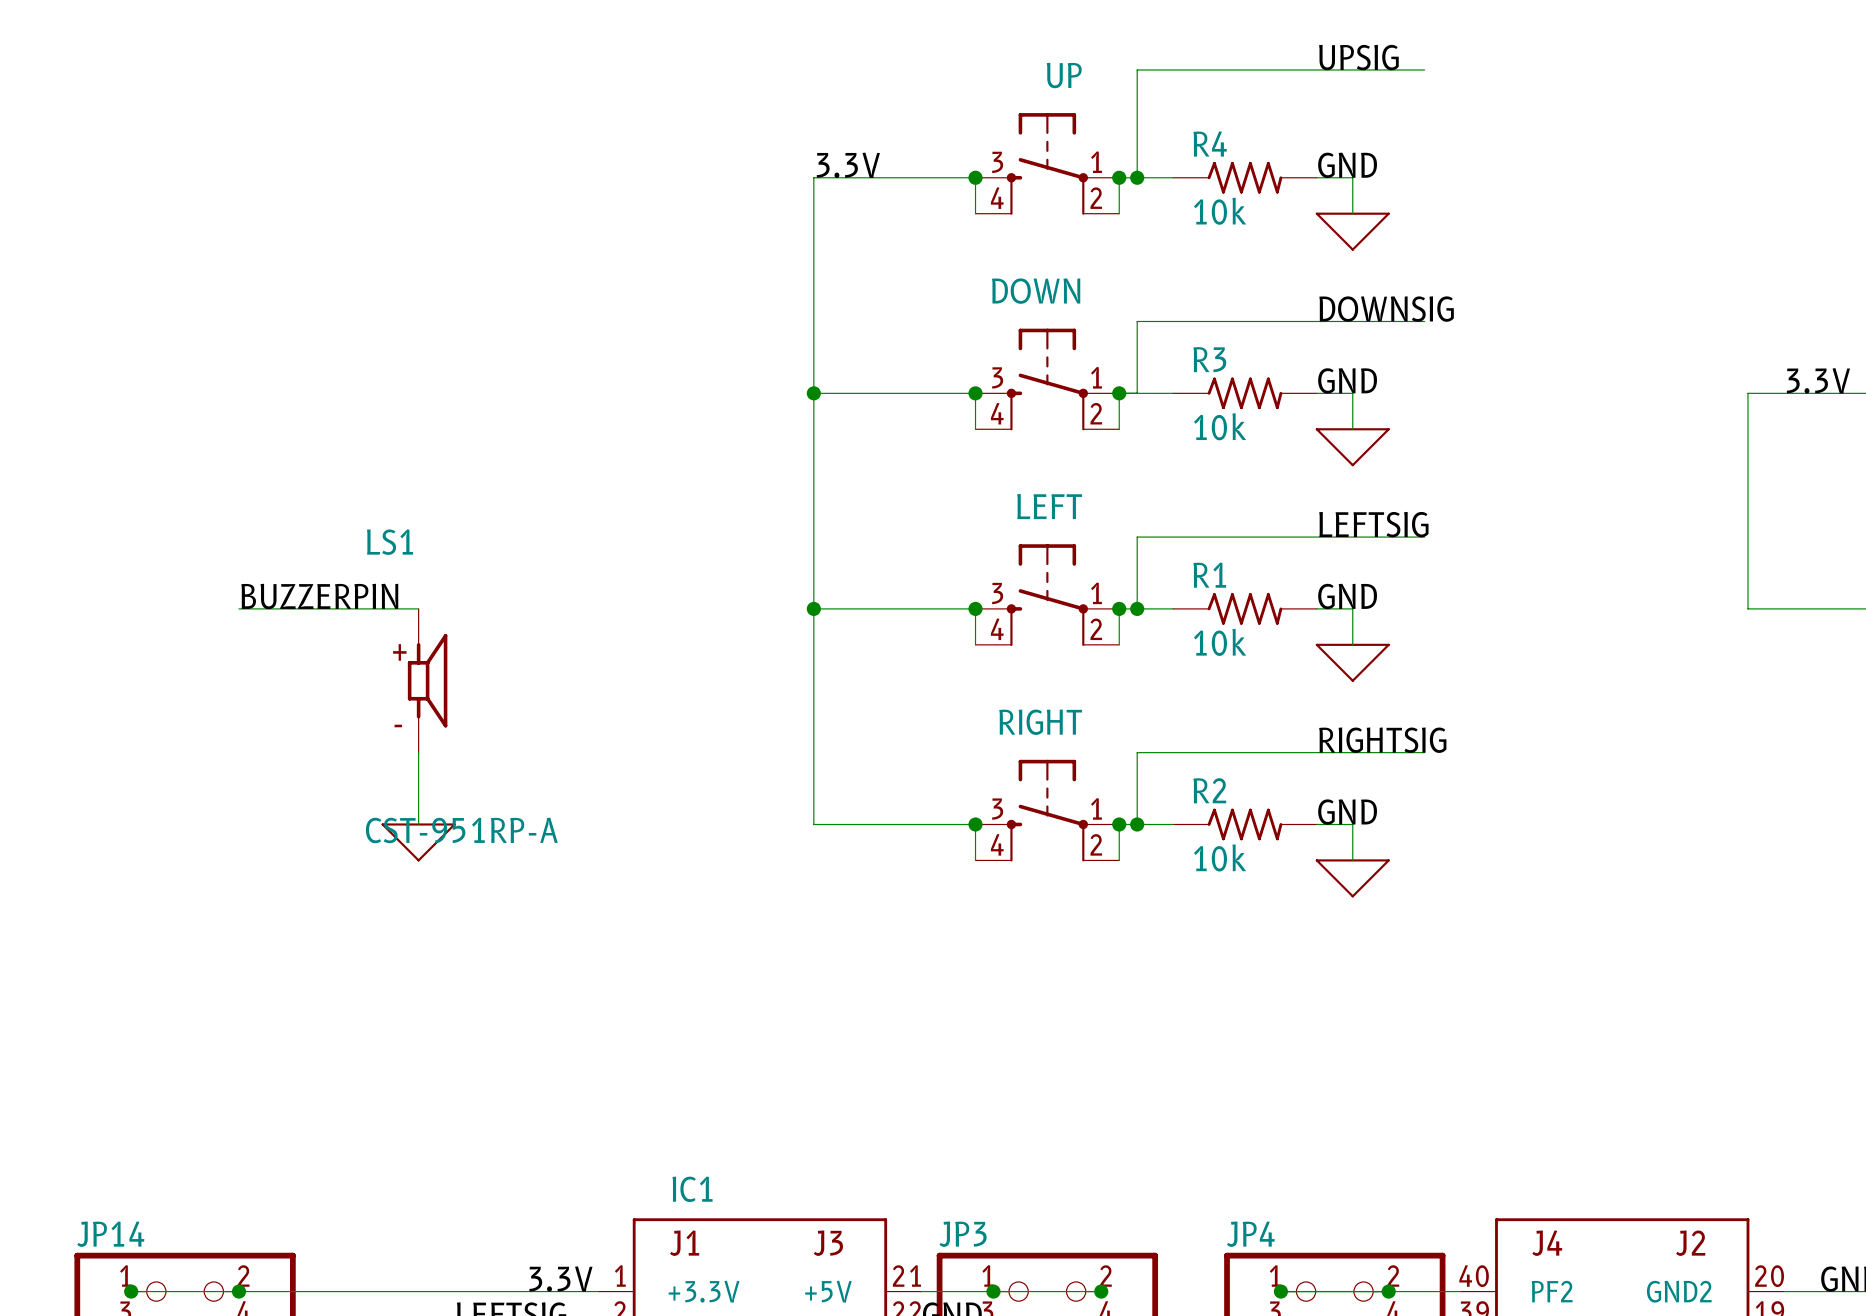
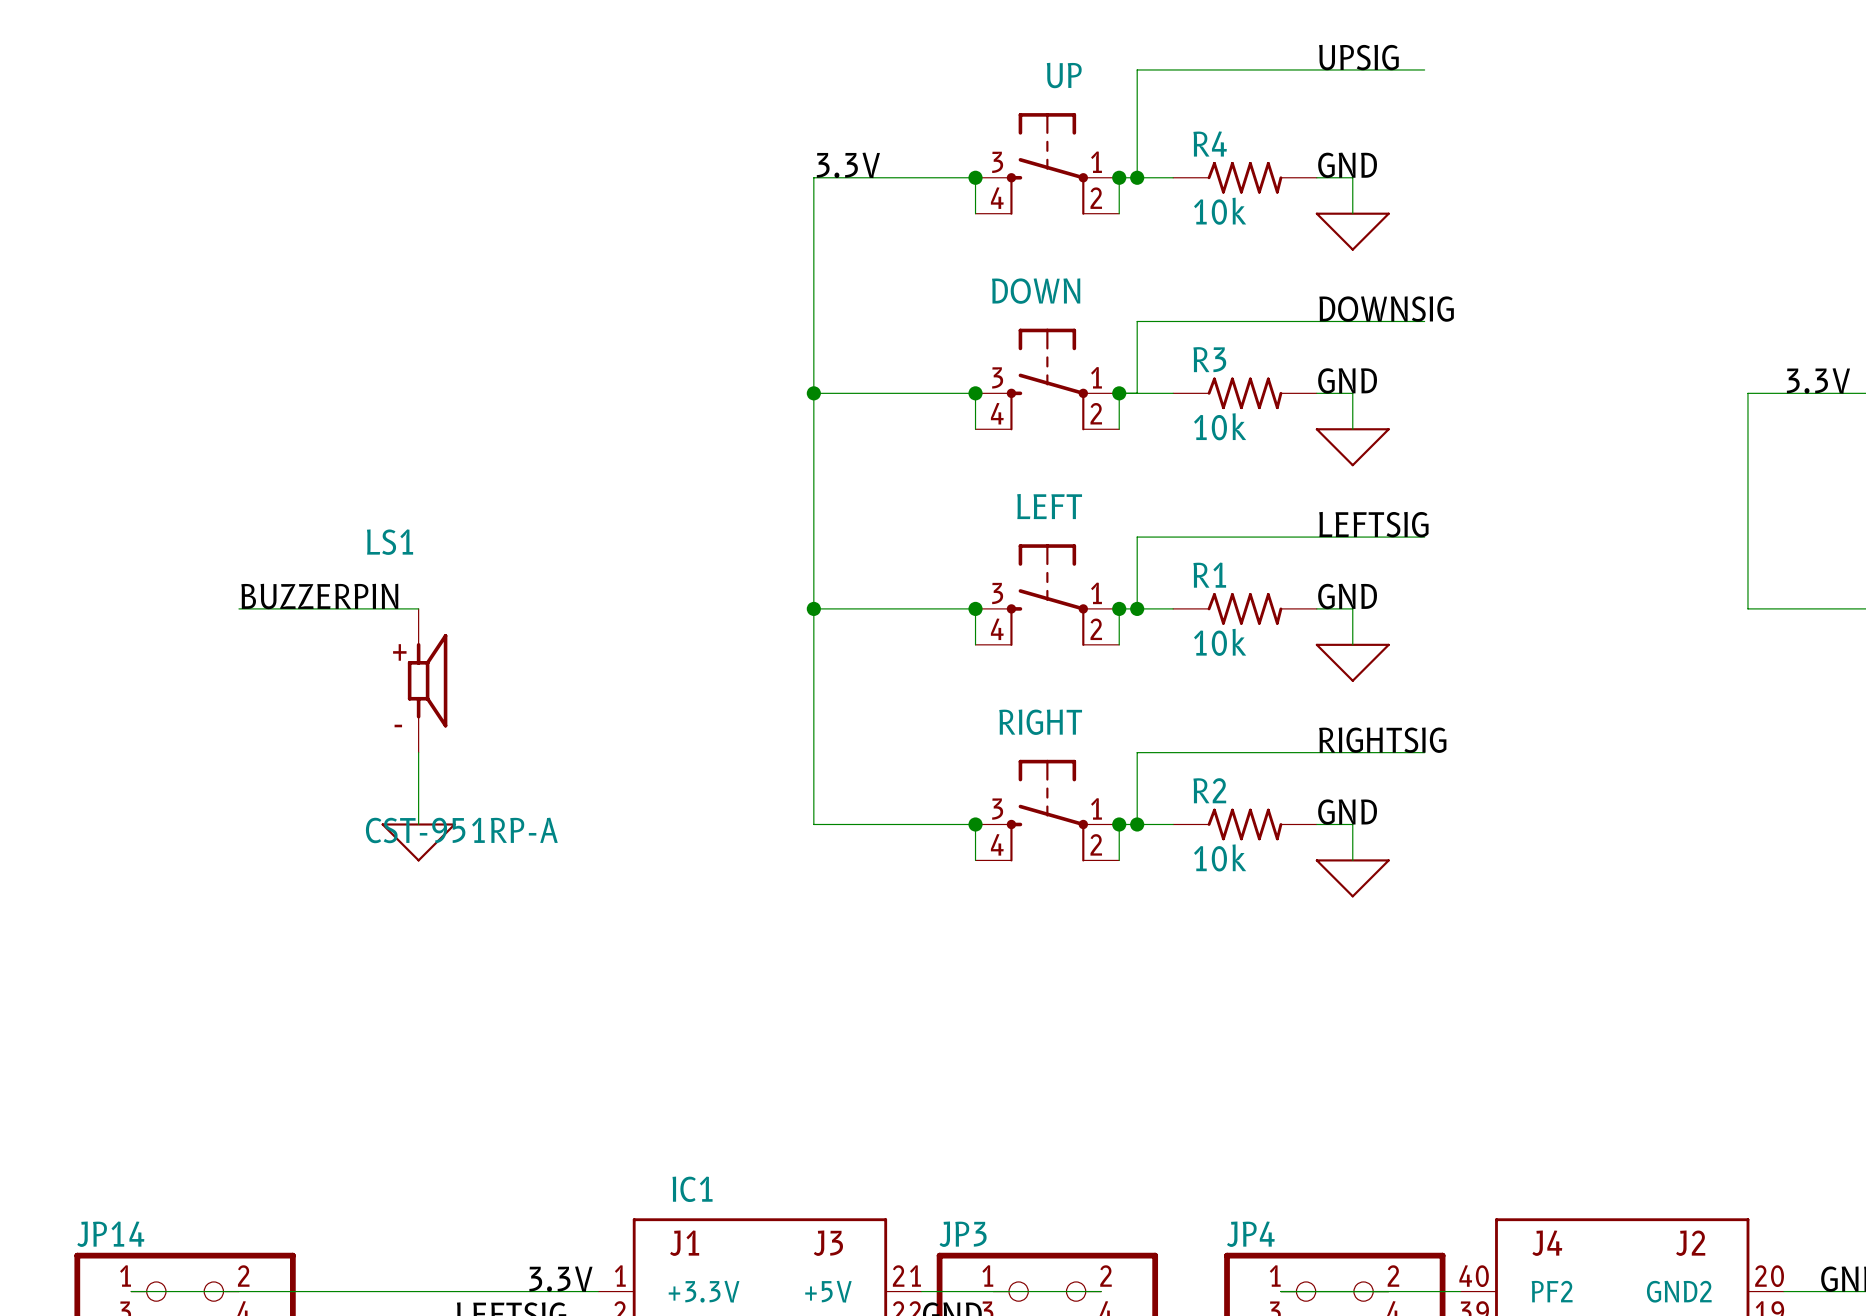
junction: (131, 1291) -> none
junction: (238, 1291) -> none
junction: (993, 1291) -> none
junction: (1101, 1291) -> none
junction: (1280, 1291) -> none
junction: (1388, 1291) -> none

